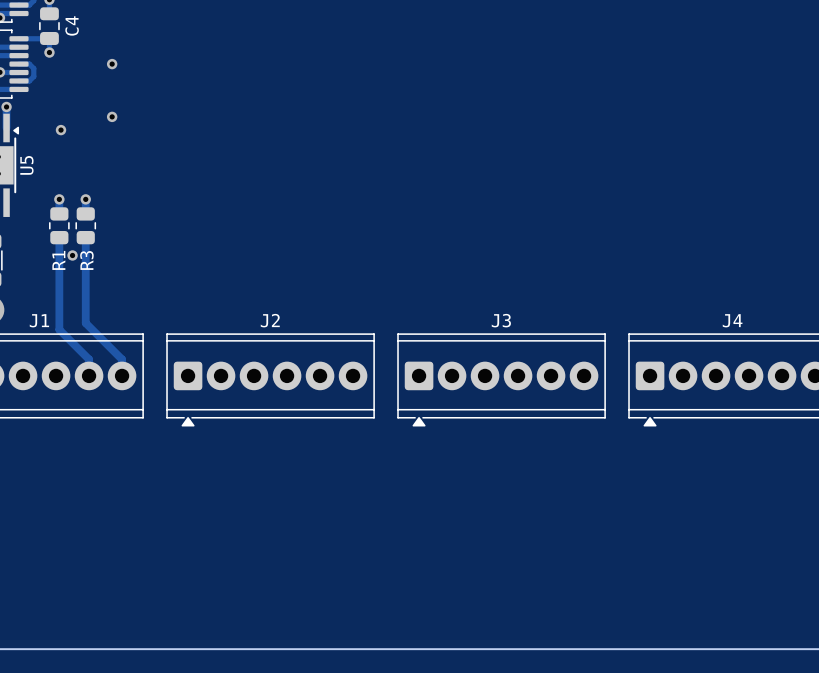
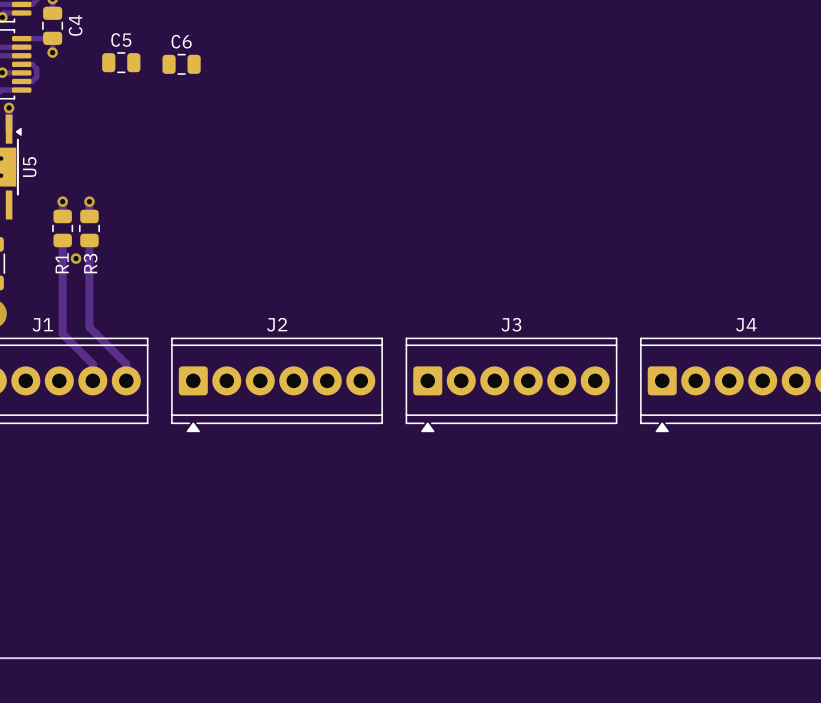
C5: none -> (121, 62)
via: (112, 64) -> none
C6: none -> (181, 64)
via: (112, 116) -> none
via: (61, 130) -> none

